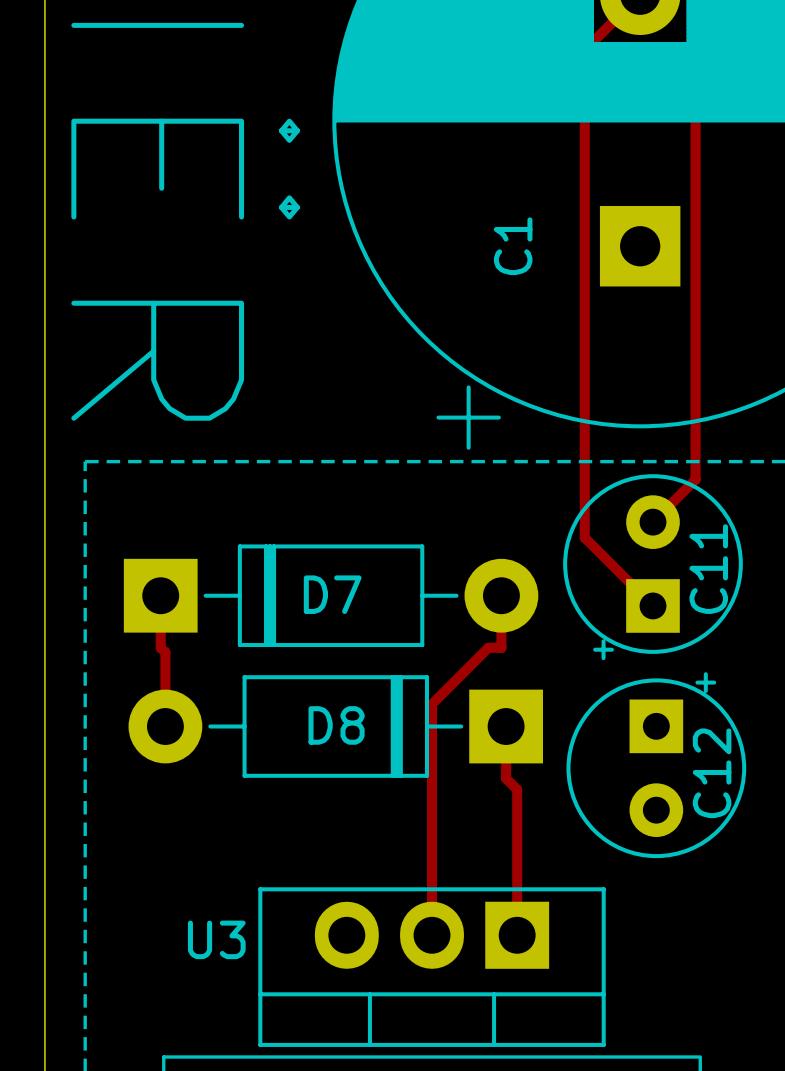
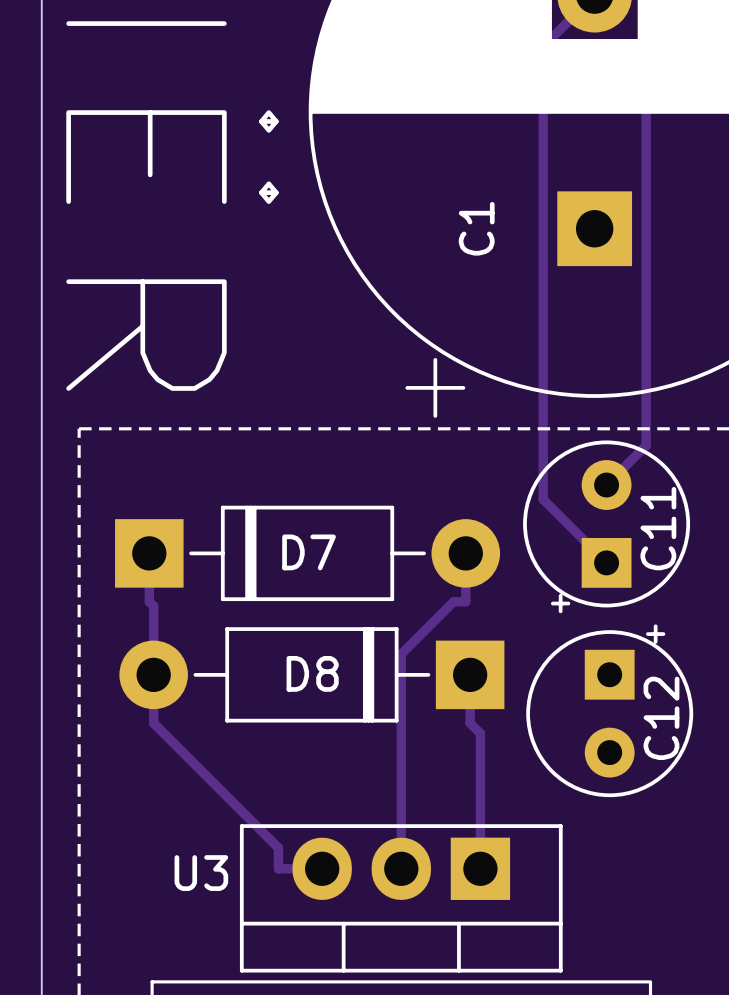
track: none -> (153, 674) (153, 723) (278, 847) (278, 868) (322, 868)

